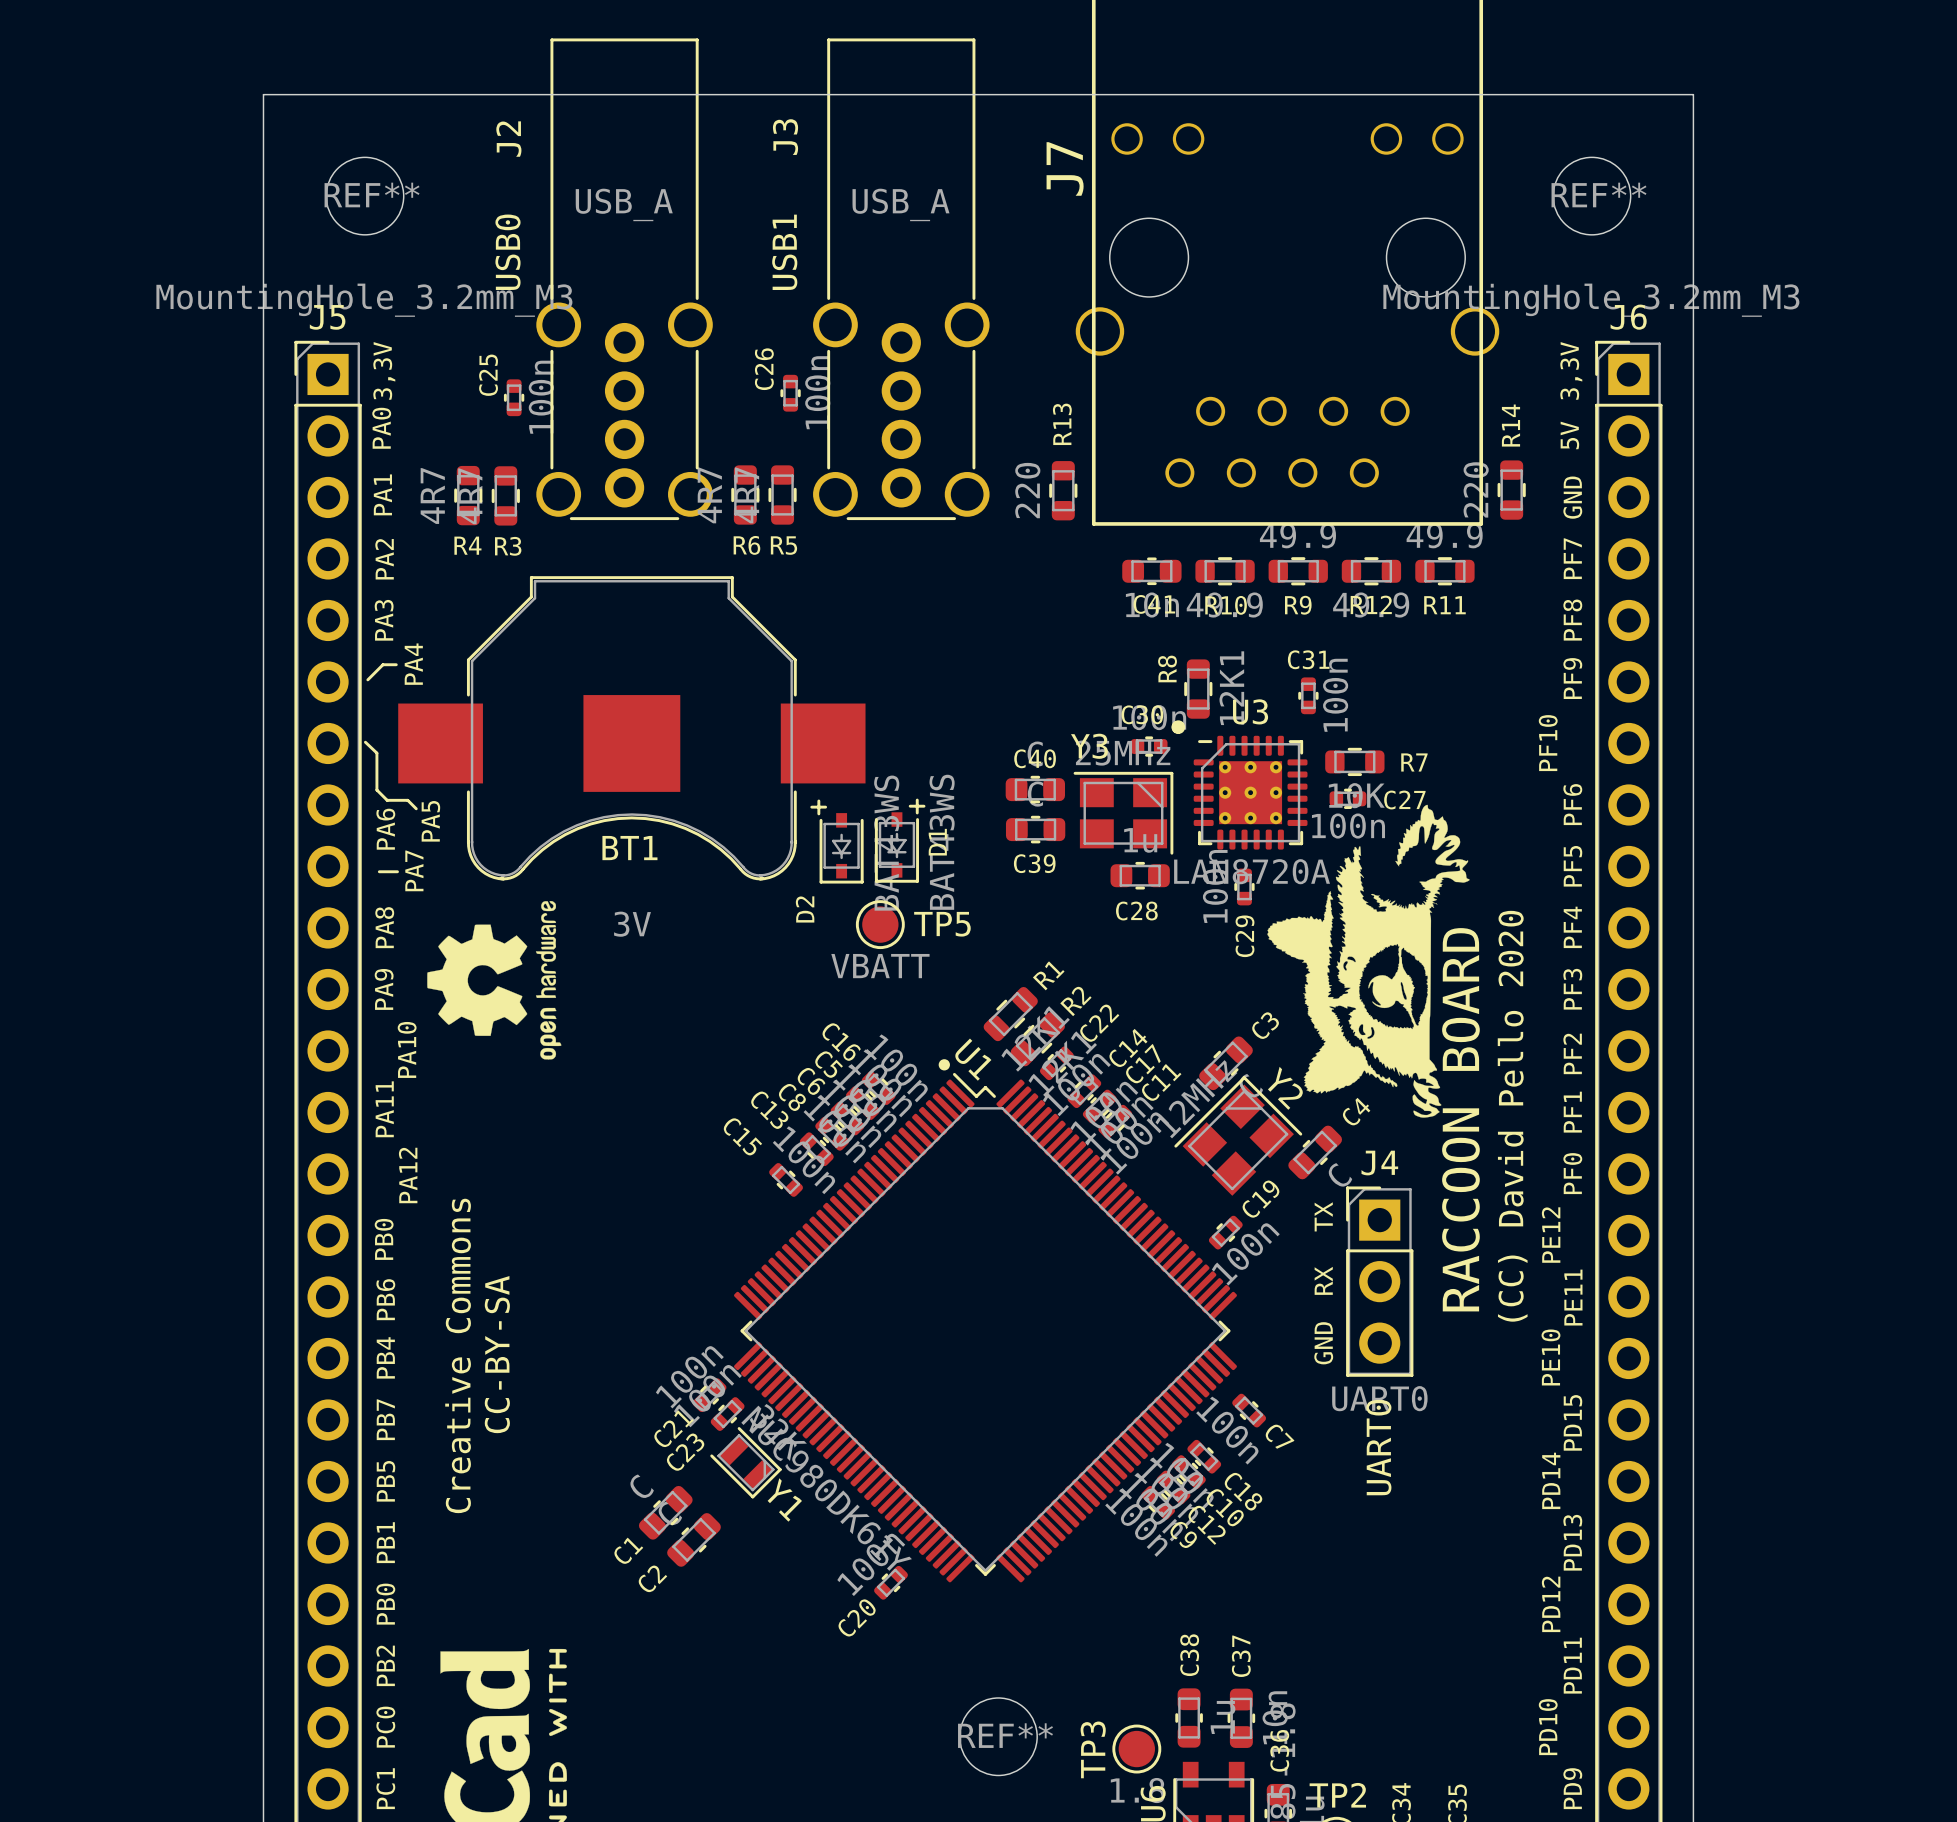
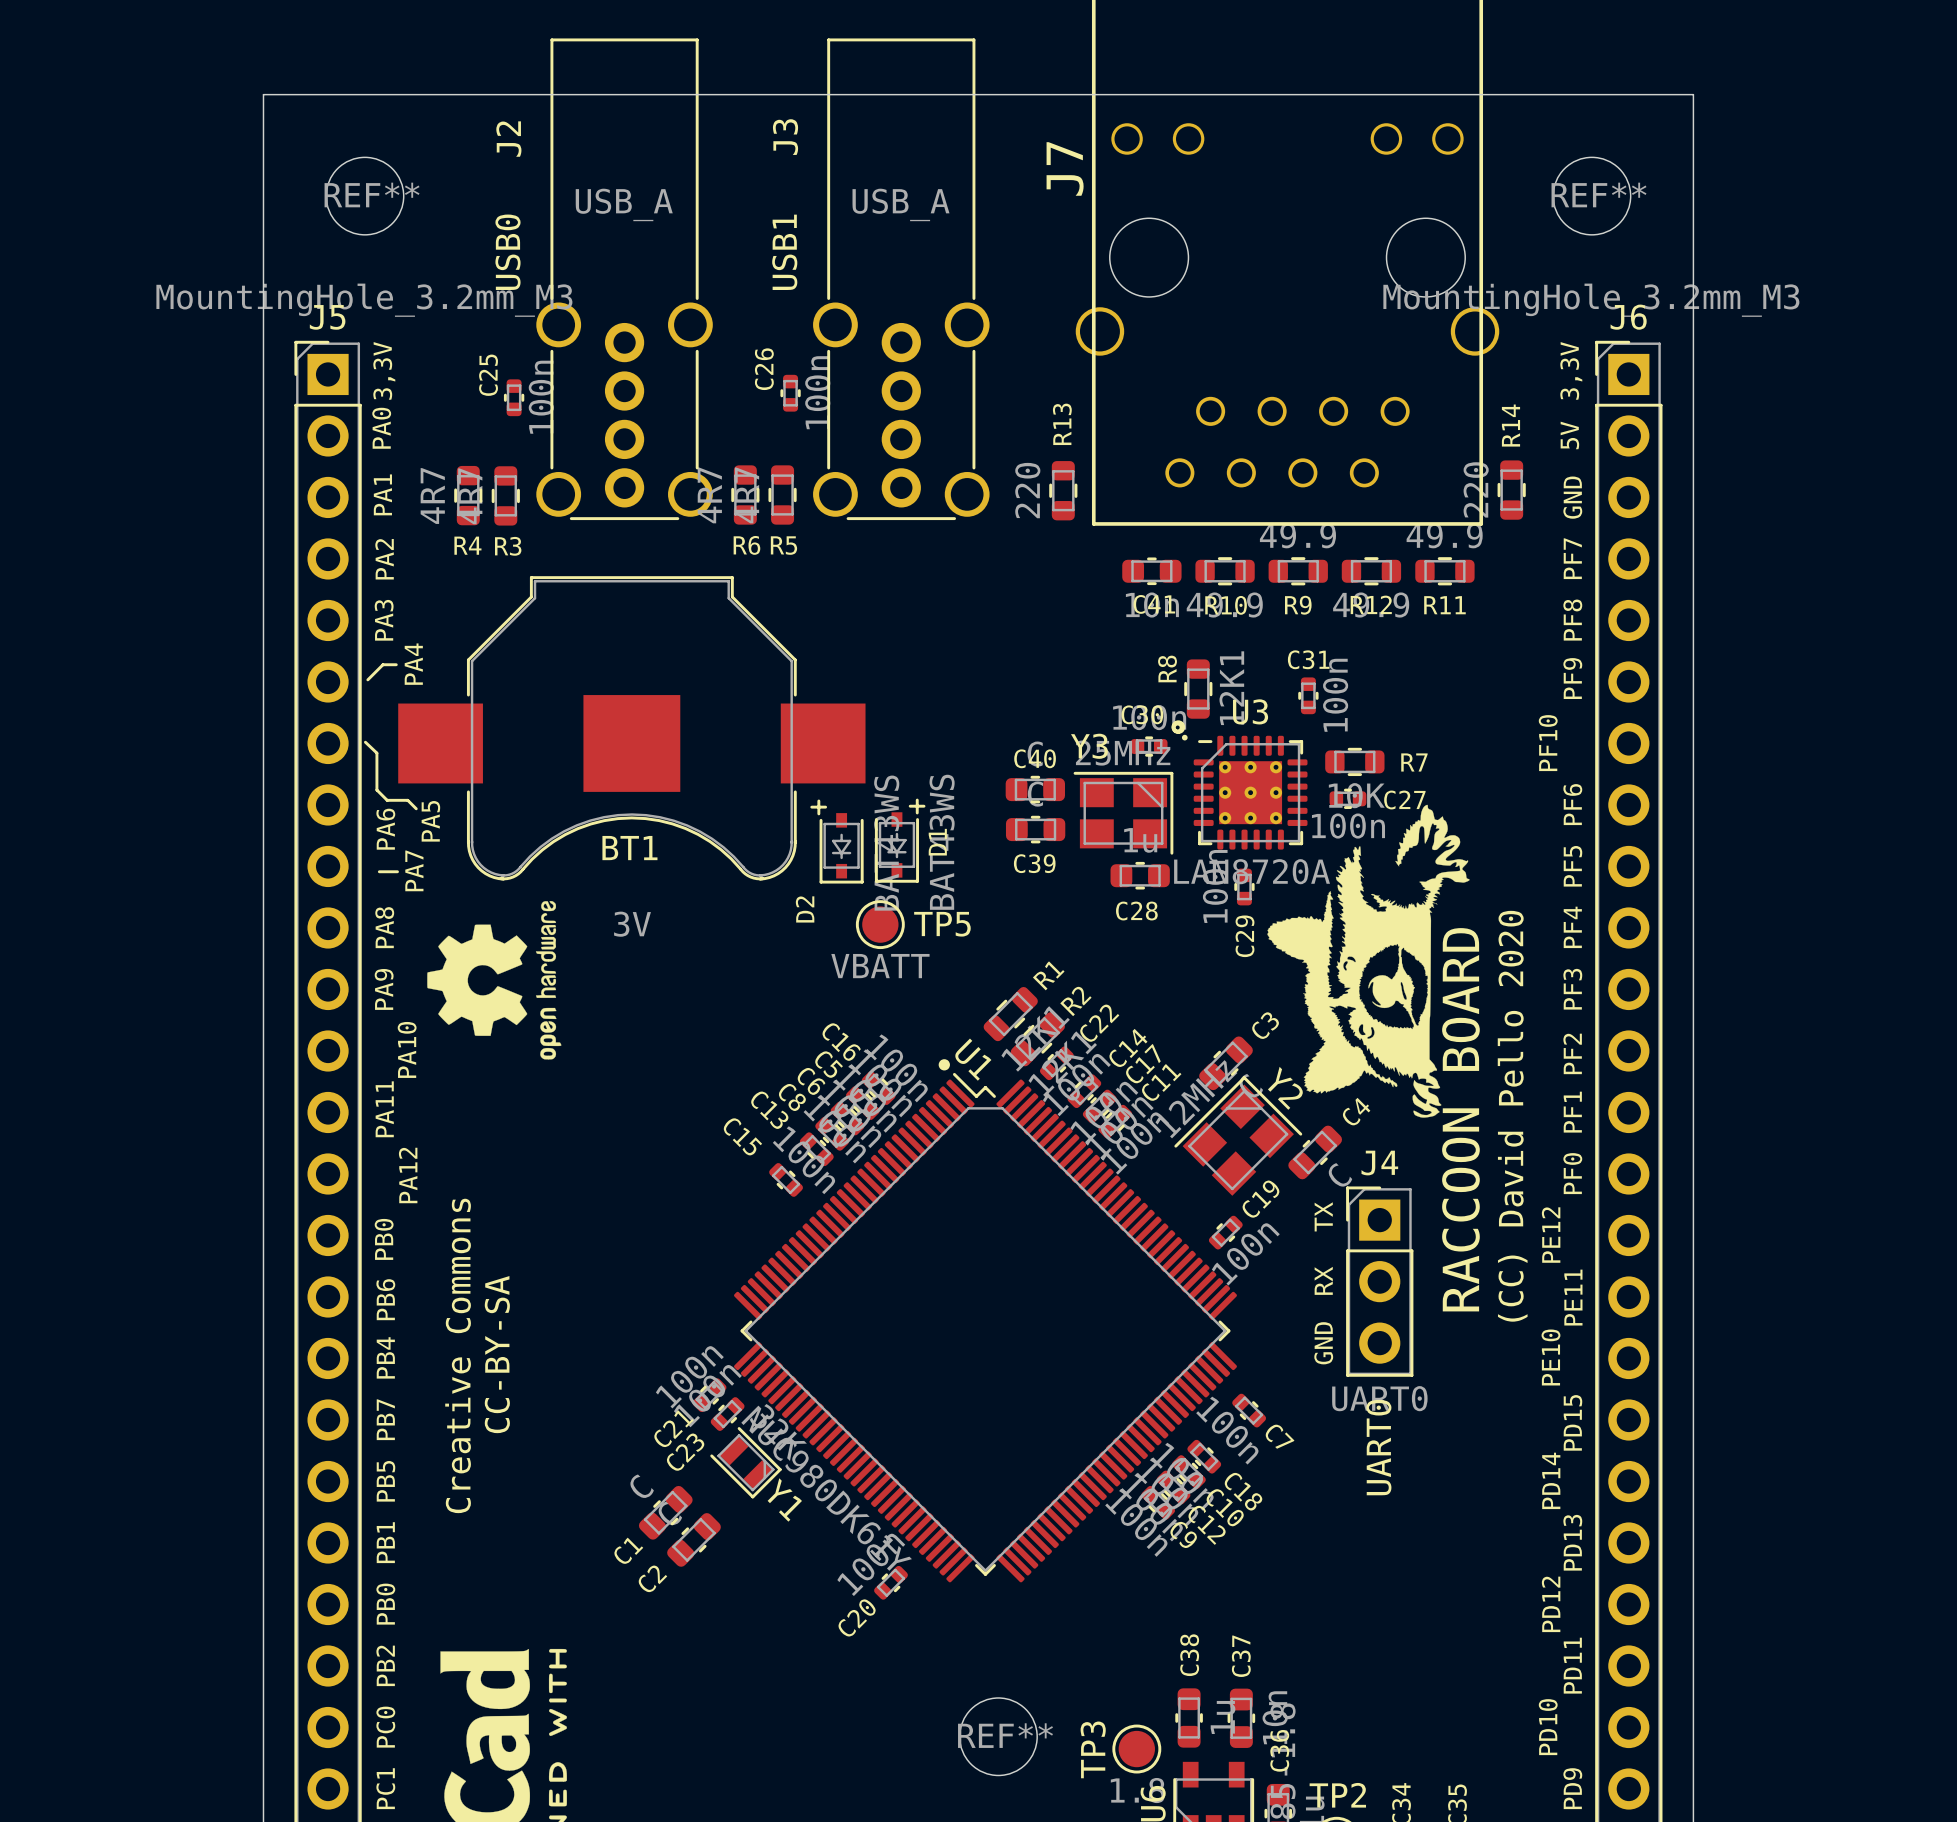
drawing position: (1177, 727) -> (1184, 737)

